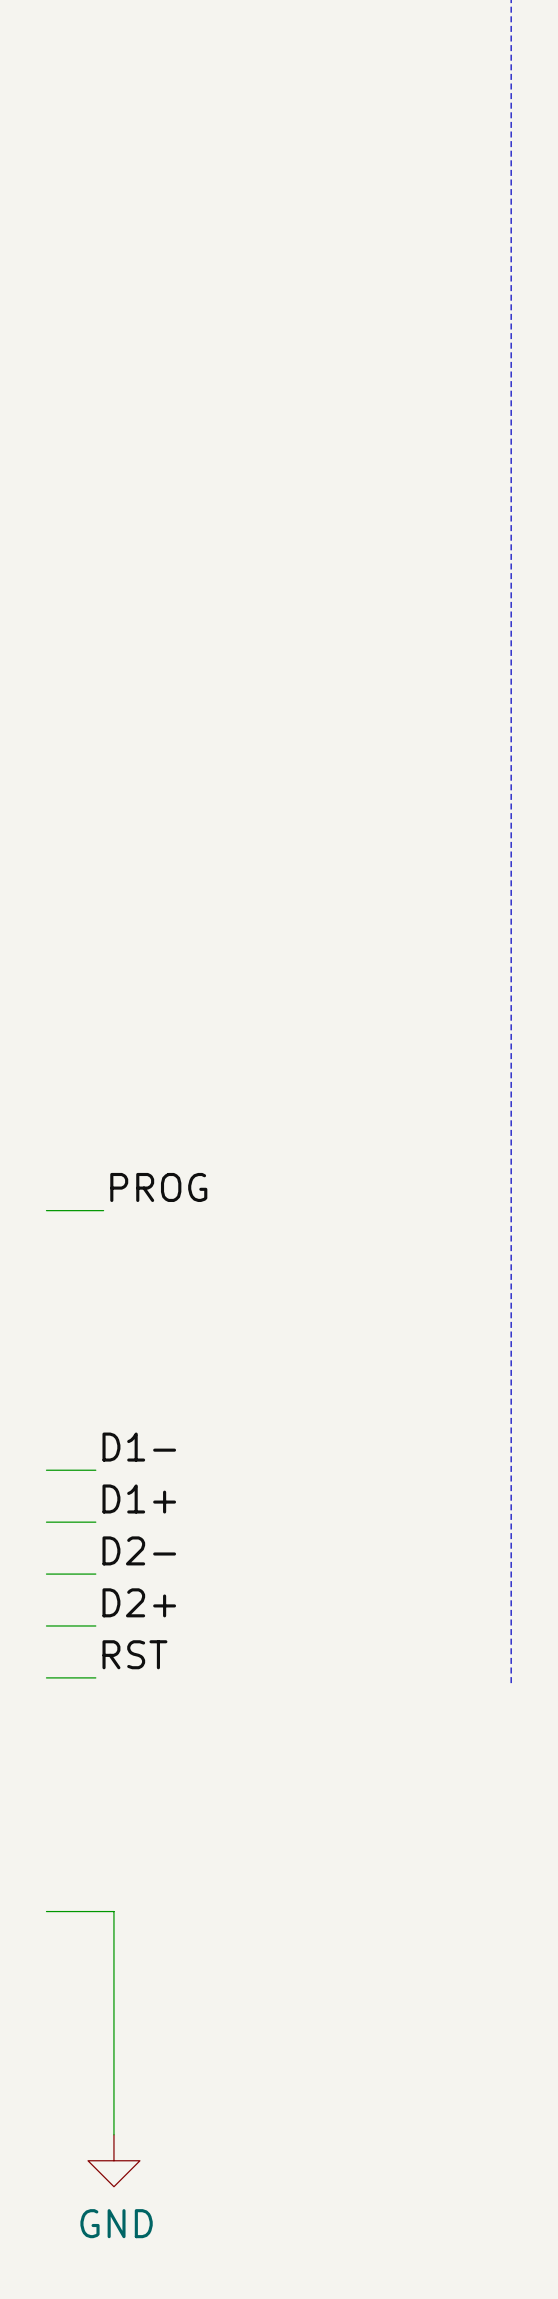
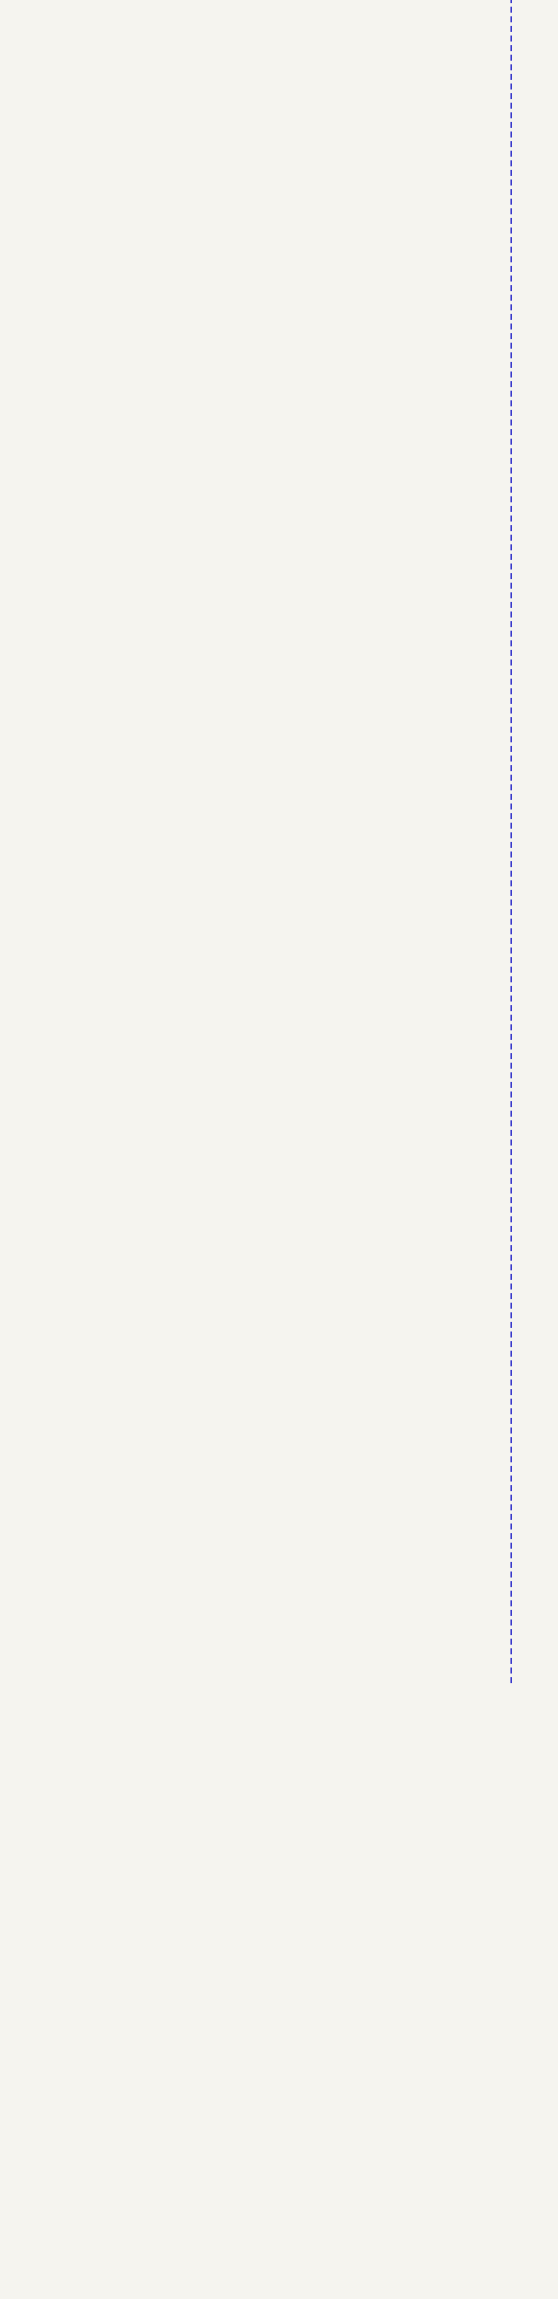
label: PROG (158, 1187) -> none
wire: (46, 1210) (103, 1210) -> none
label: D1- (139, 1447) -> none
wire: (46, 1470) (95, 1470) -> none
label: D1+ (139, 1498) -> none
wire: (46, 1522) (95, 1522) -> none
label: D2- (139, 1550) -> none
wire: (46, 1574) (95, 1574) -> none
label: D2+ (139, 1602) -> none
wire: (46, 1625) (95, 1625) -> none
label: RST (134, 1654) -> none
wire: (46, 1677) (95, 1677) -> none
wire: (46, 1911) (113, 1911) (113, 2134) -> none
power symbol: GND (113, 2160) -> none

